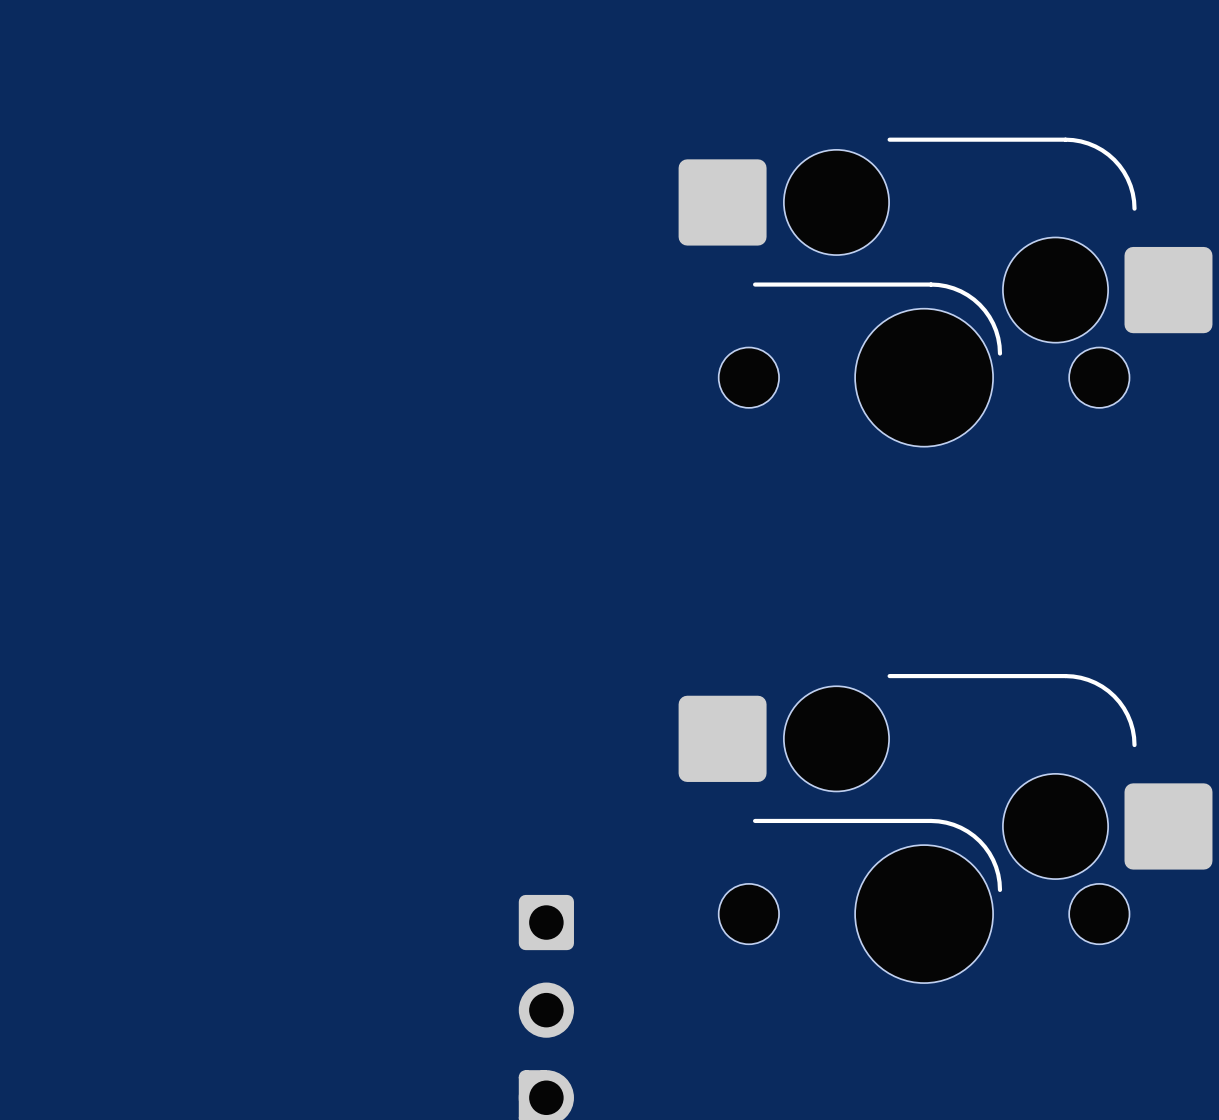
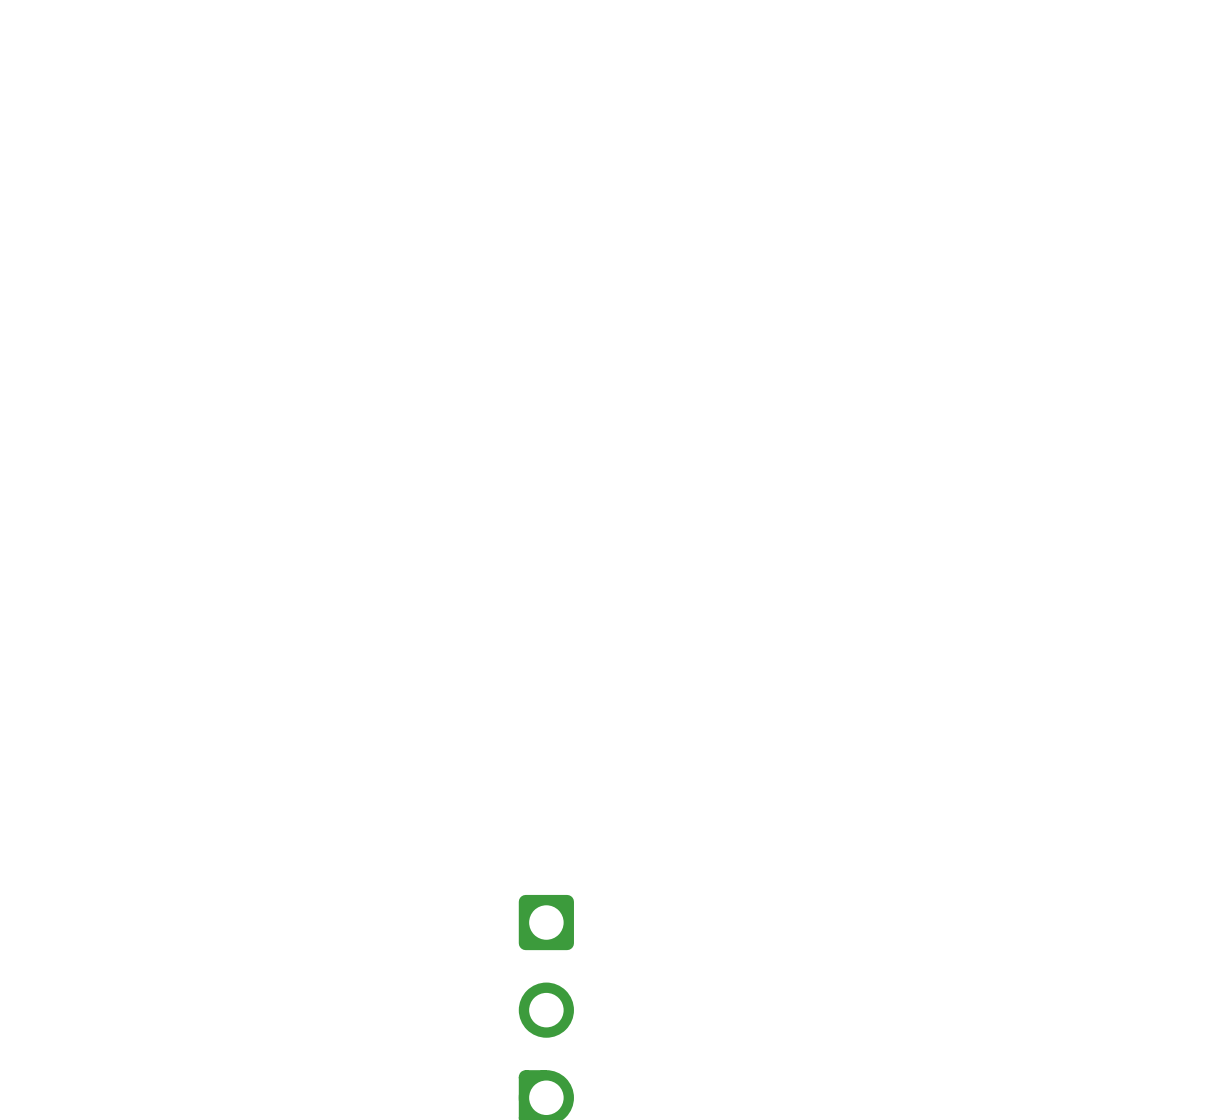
part: (945, 292) -> none
part: (945, 828) -> none

